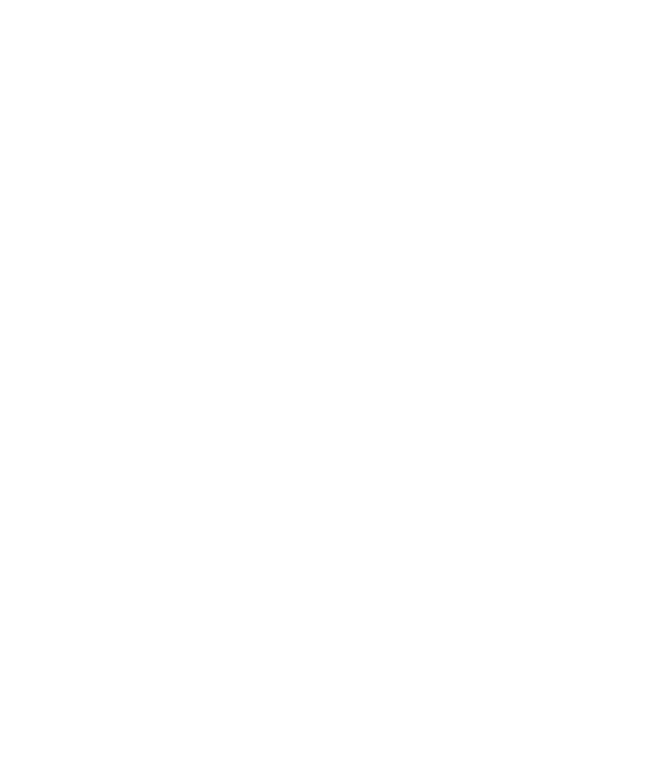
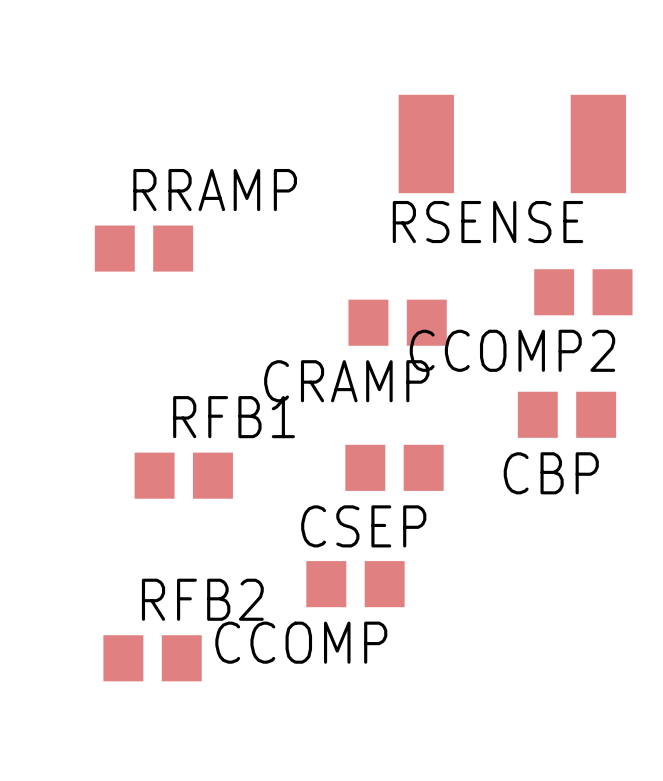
RSENSE: none -> (512, 143)
RRAMP: none -> (143, 248)
CCOMP2: none -> (583, 292)
CRAMP: none -> (397, 322)
CBP: none -> (566, 414)
CSEP: none -> (394, 467)
RFB1: none -> (183, 475)
CCOMP: none -> (355, 584)
RFB2: none -> (152, 658)

